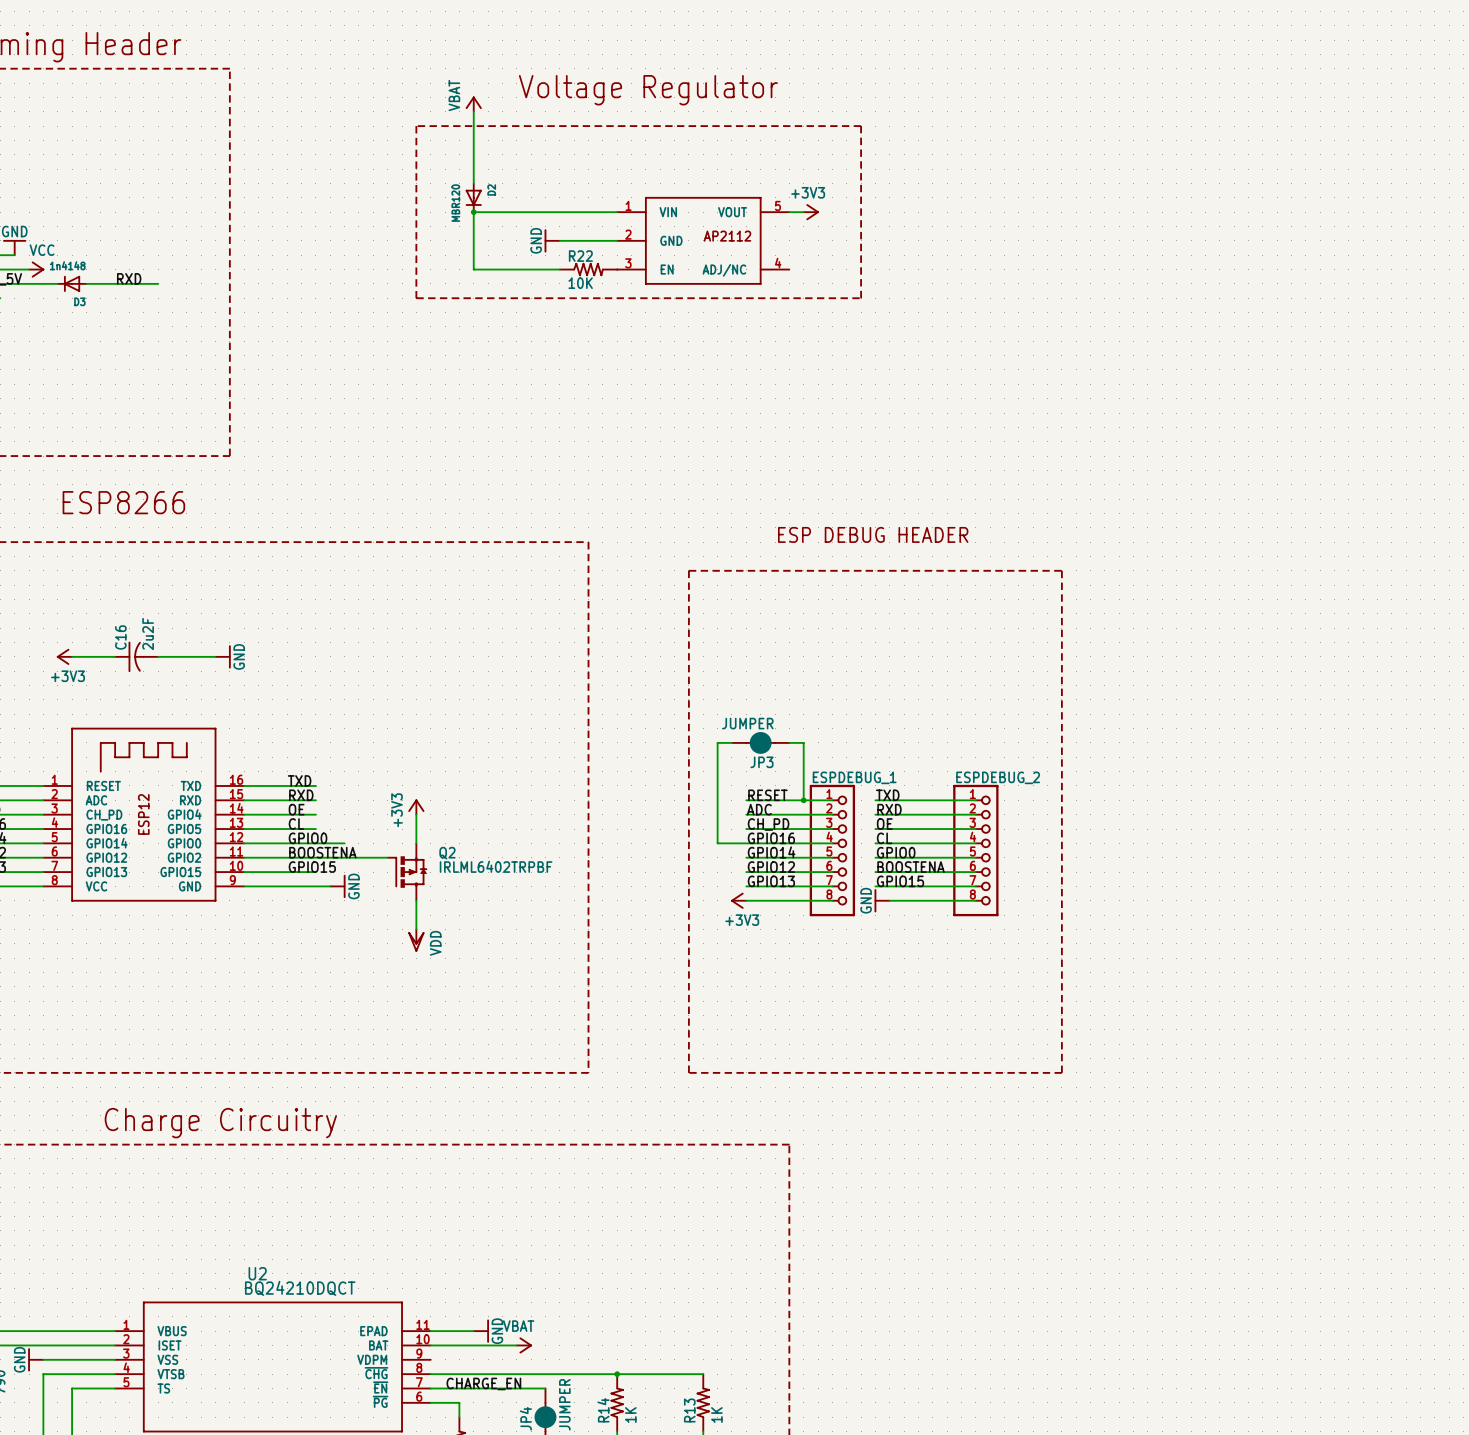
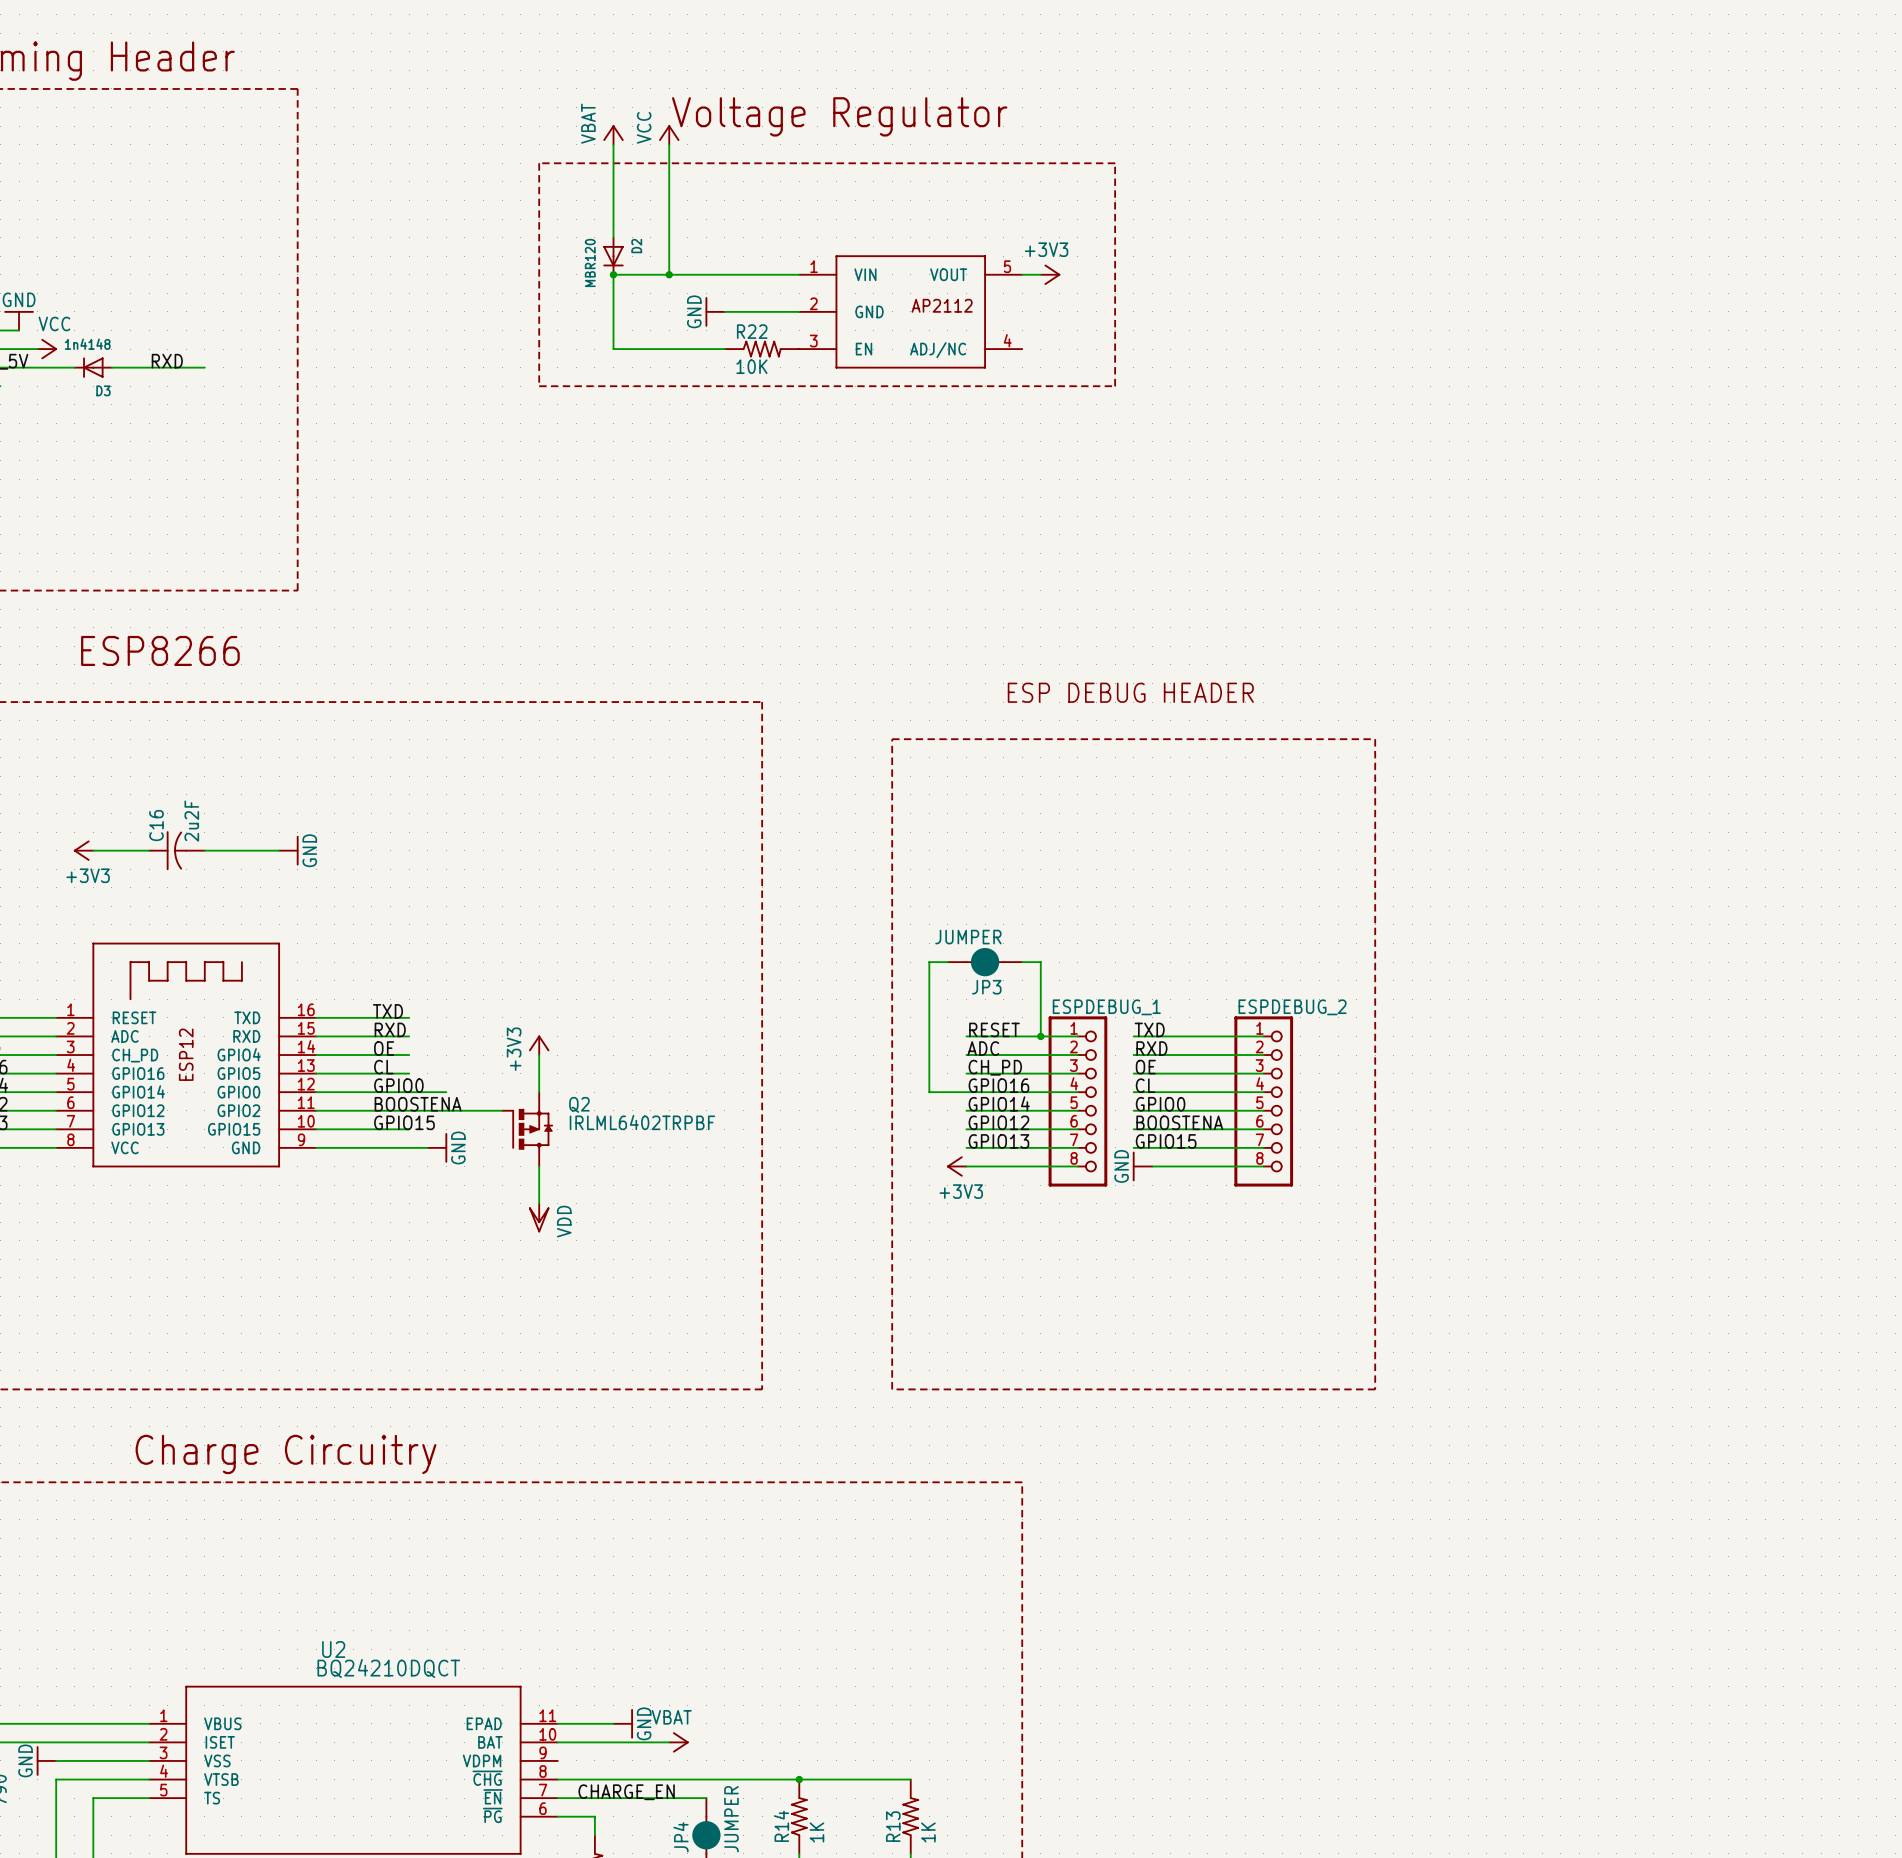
power symbol: none -> VCC (669, 134)
wire: none -> (669, 144) (669, 274)
junction: none -> (669, 274)

